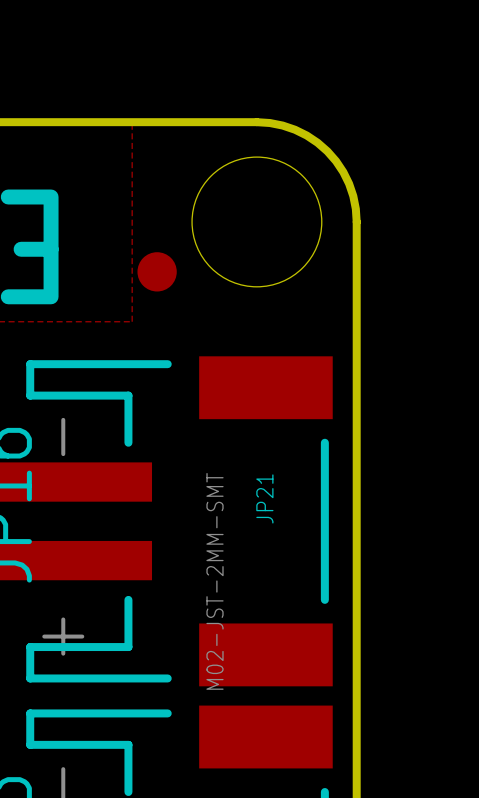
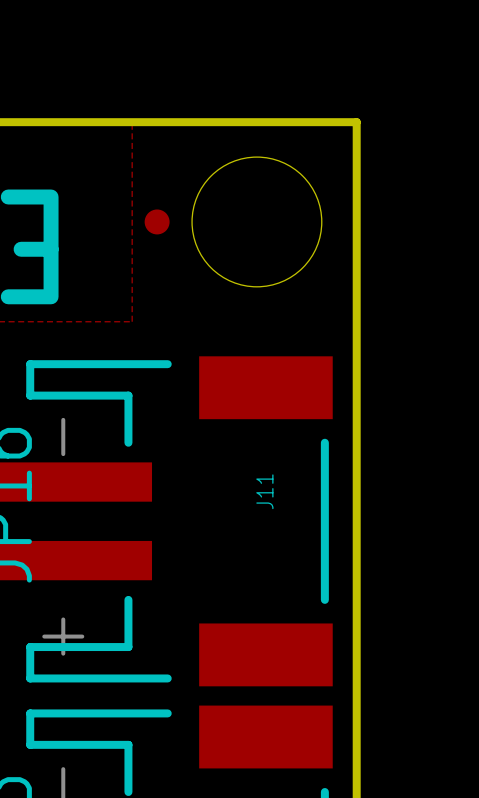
board edge: (256, 122) (282, 125) (295, 129) (317, 142) (327, 151) (336, 161) (349, 183) (353, 196) (356, 221) -> (256, 122) (356, 122) (356, 221)
part: none -> (157, 221)
part: (157, 271) -> none
JP21 name: JP21 (264, 498) -> J11 (264, 491)
JP21 value: M02-JST-2MM-SMT (215, 581) -> none

